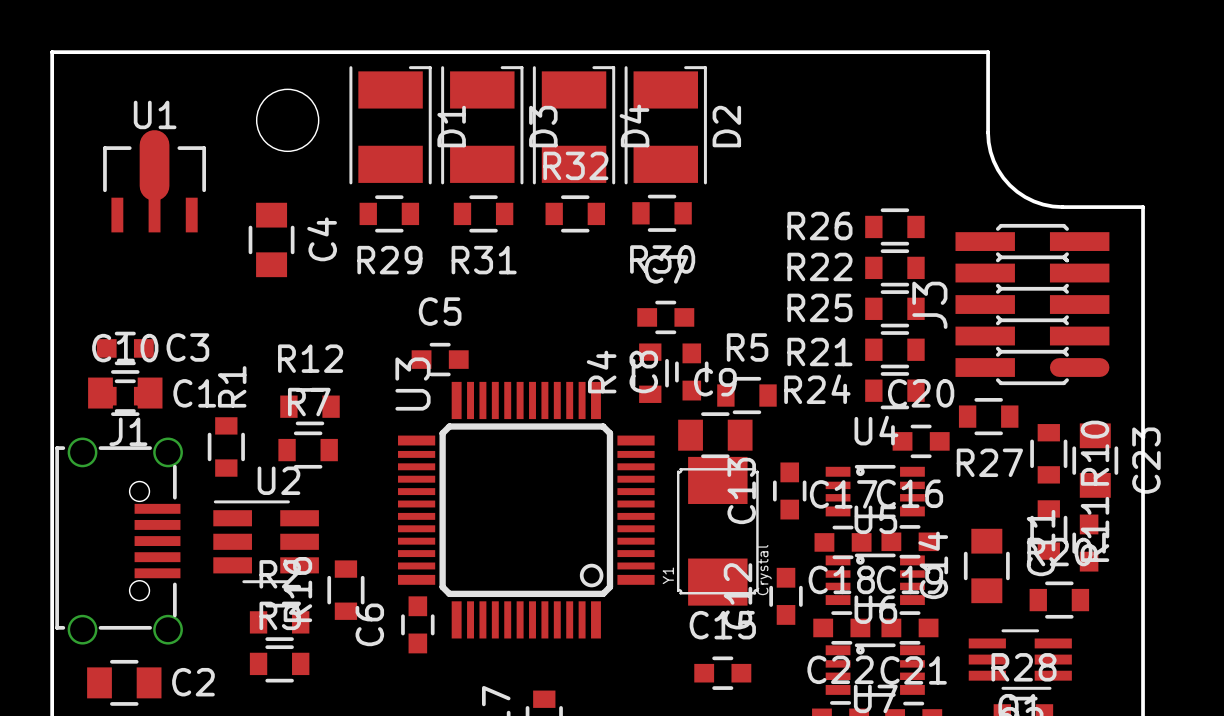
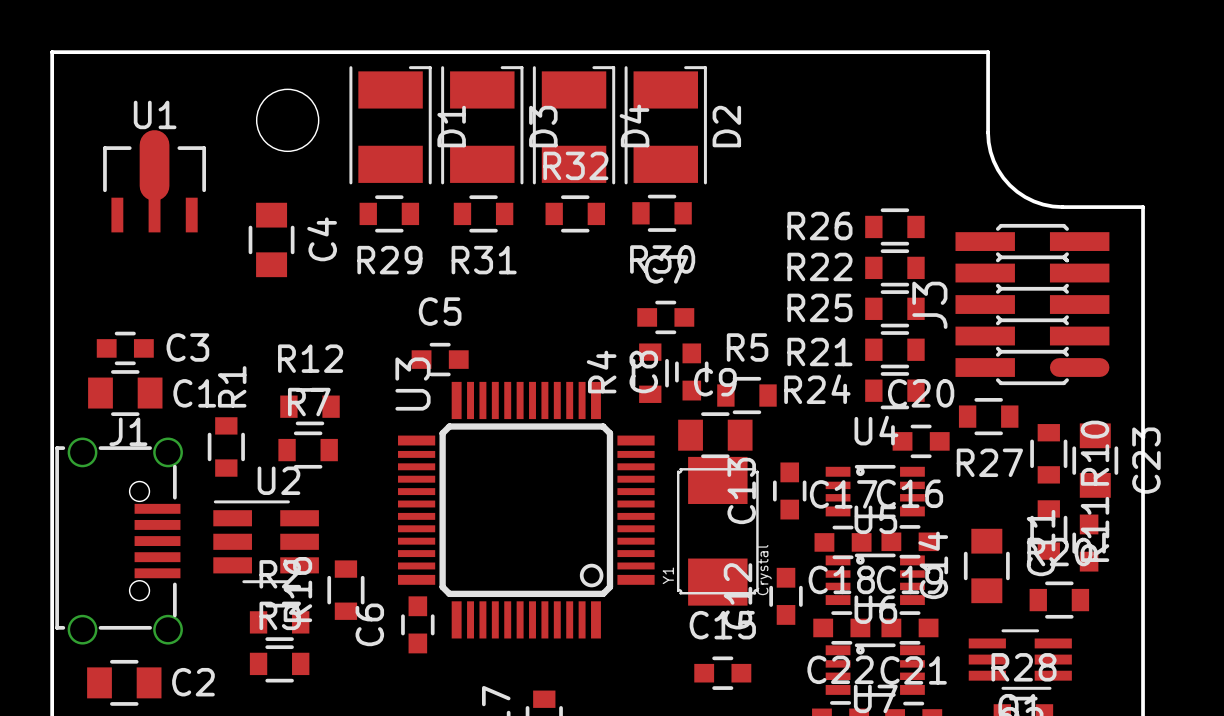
C10: (125, 396) -> none

